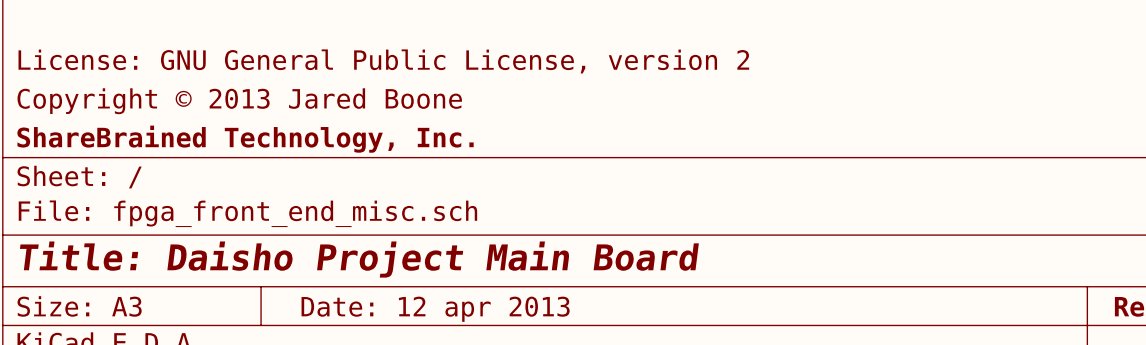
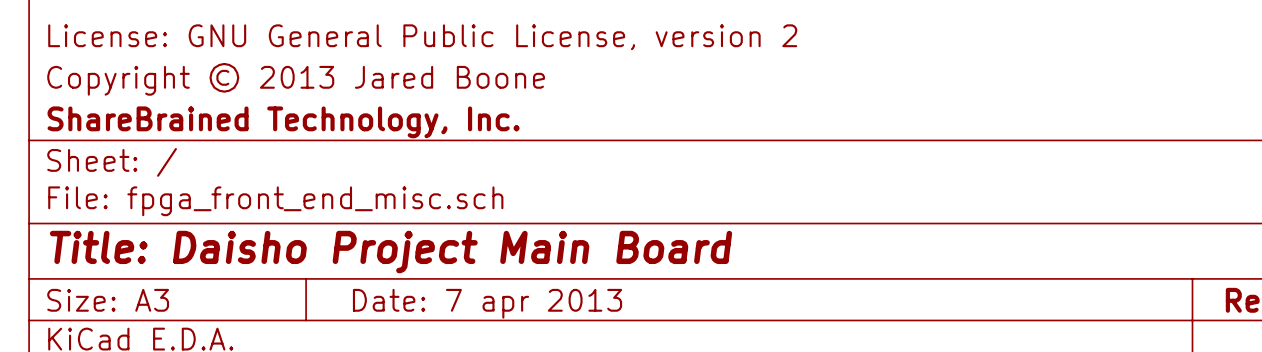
title block: Date: 12 apr 2013 (435, 309) -> Date: 7 apr 2013 (487, 303)

